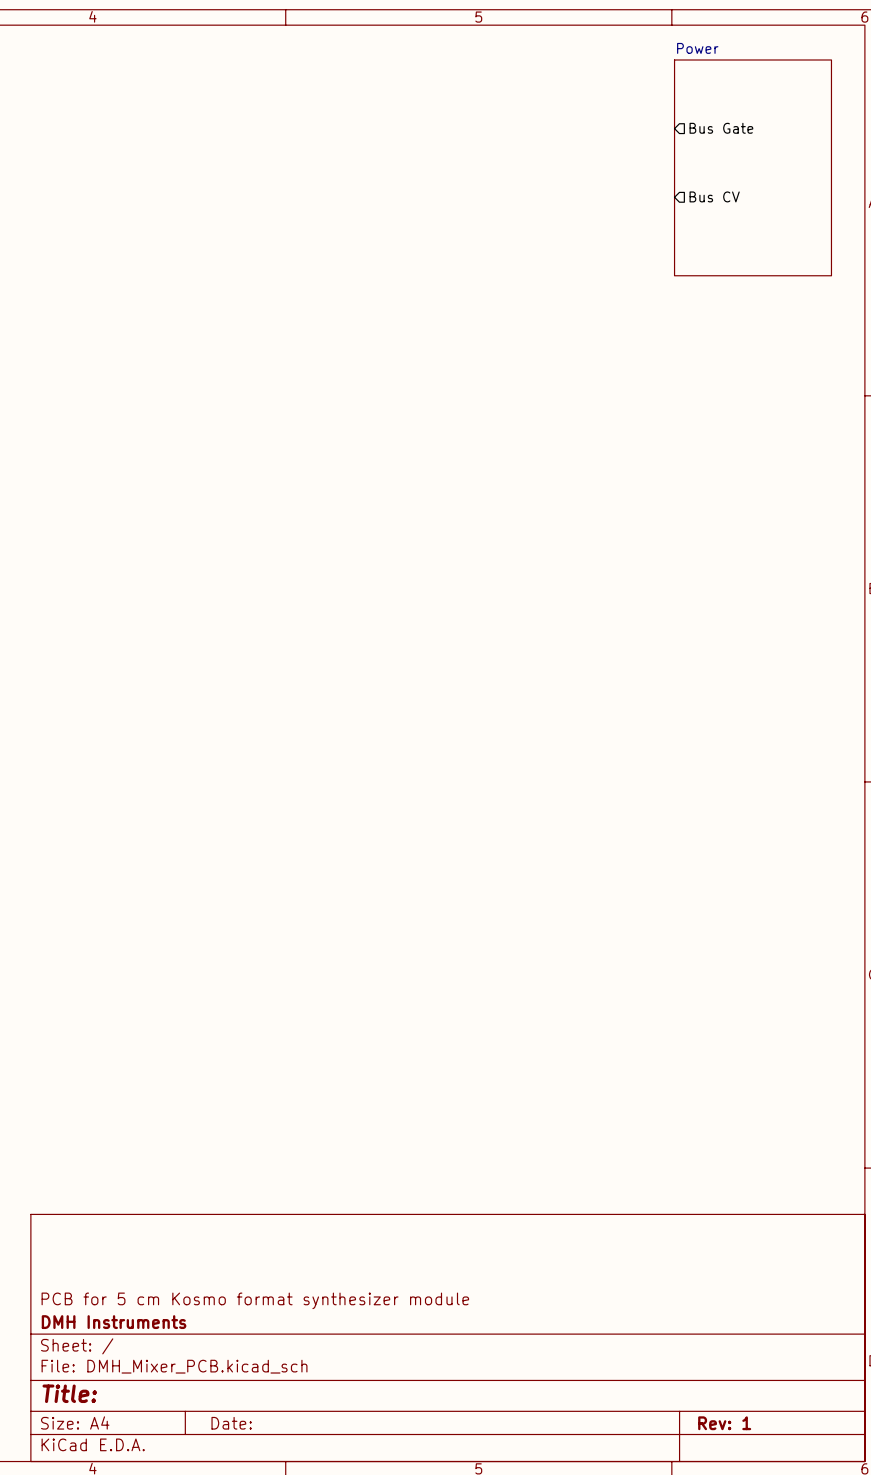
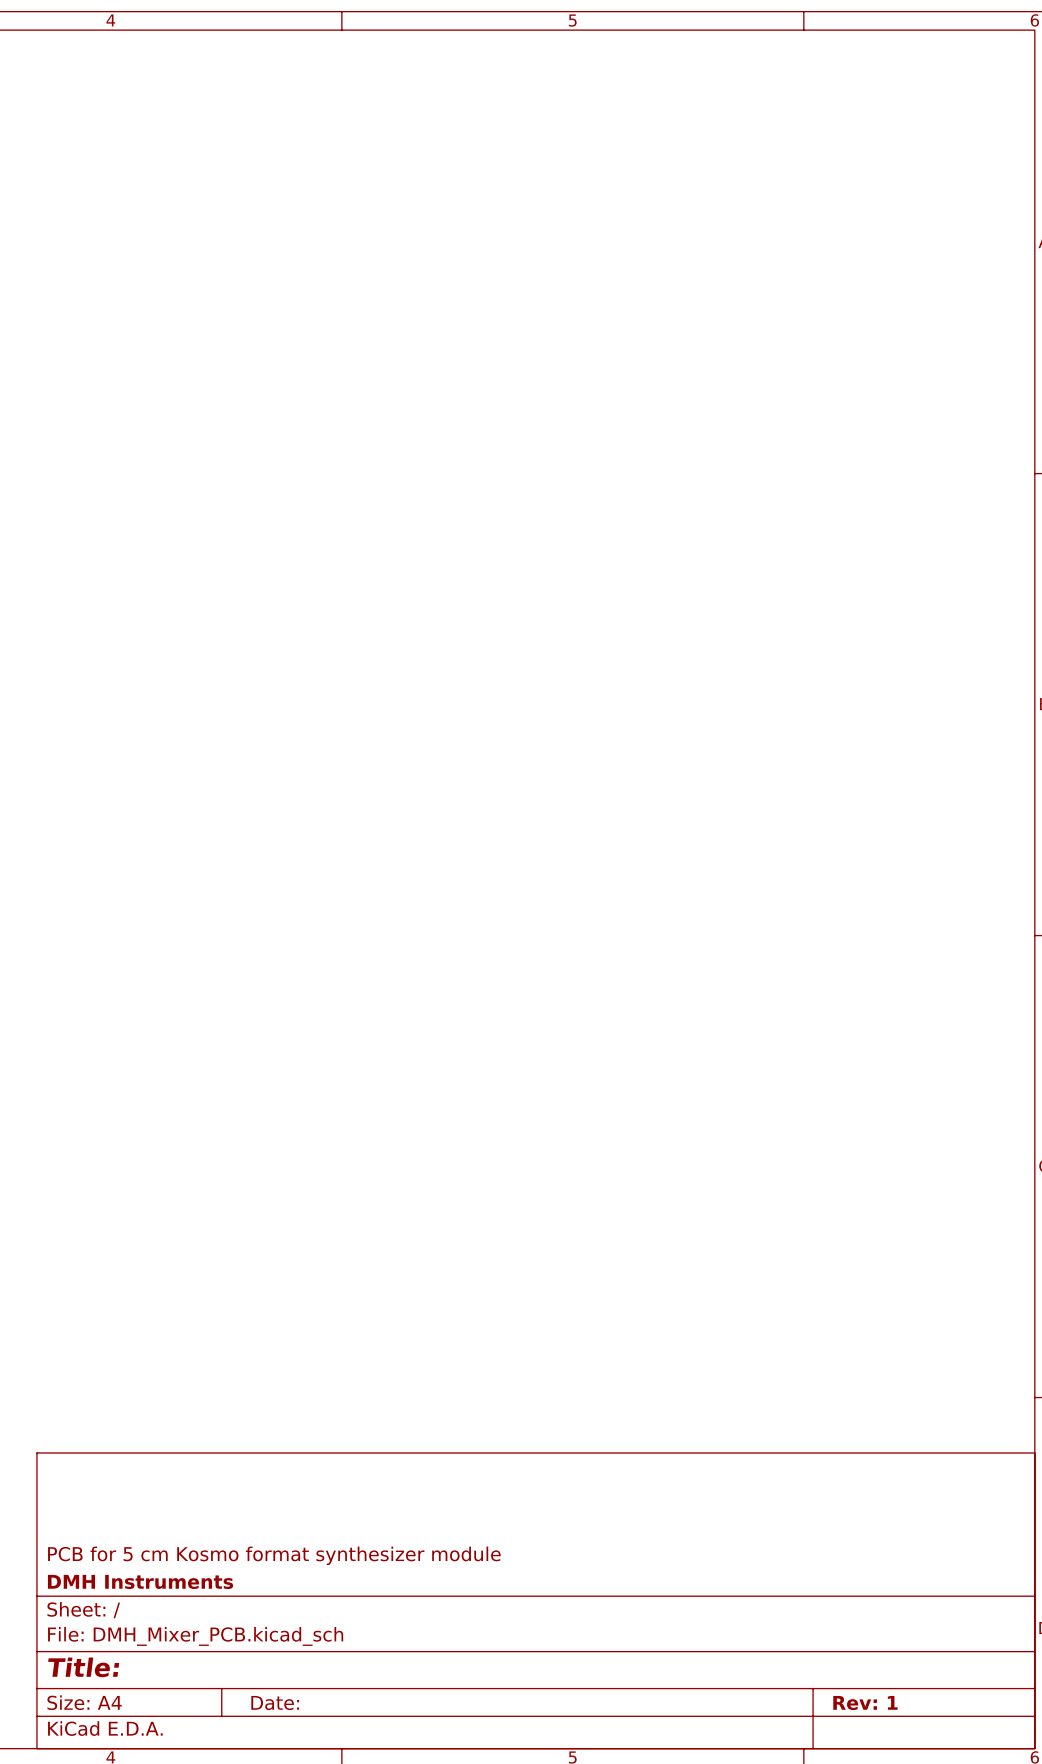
sheet pin: Bus Gate (721, 128) -> none
sheet Power: (753, 167) -> none
sheet pin: Bus CV (714, 196) -> none

